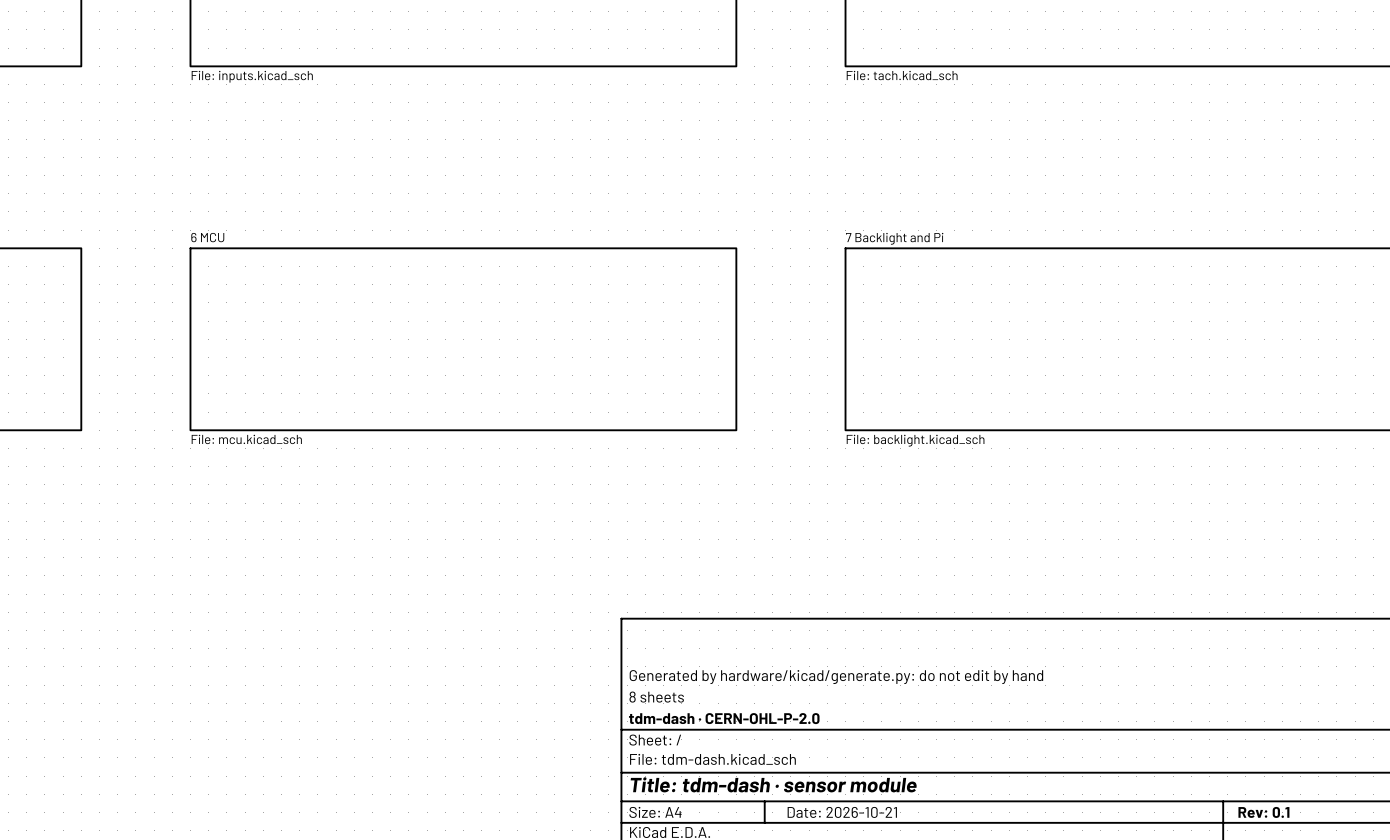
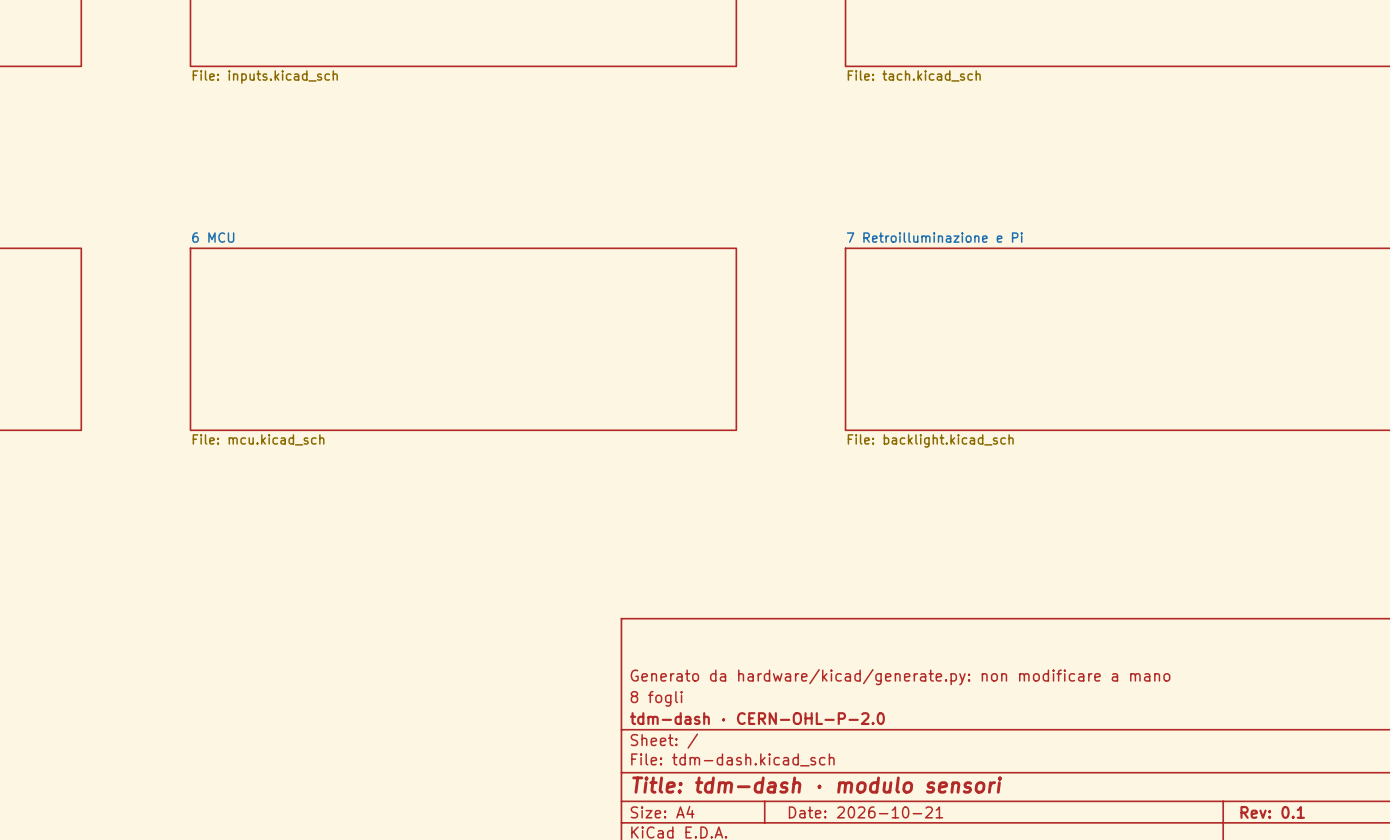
sheet 7 Backlight and Pi name: 7 Backlight and Pi (894, 238) -> 7 Retroilluminazione e Pi (934, 237)
title block: Generated by hardware/kicad/generate.py: do not edit by hand (836, 677) -> Generato da hardware/kicad/generate.py: non modificare a mano (900, 677)
title block: 8 sheets (656, 697) -> 8 fogli (656, 698)
title block: Title: tdm-dash · sensor module (773, 784) -> Title: tdm-dash · modulo sensori (817, 785)

